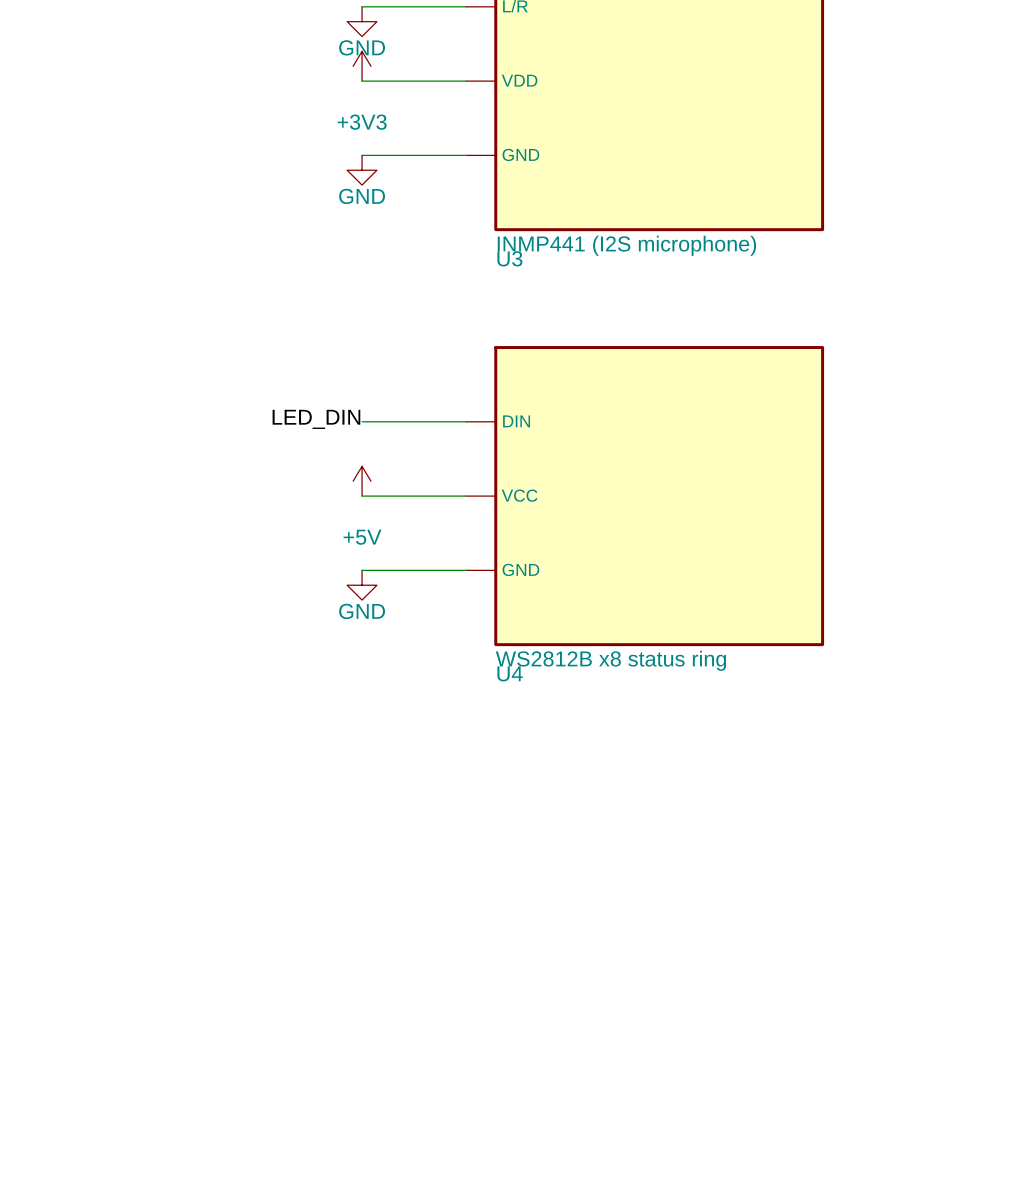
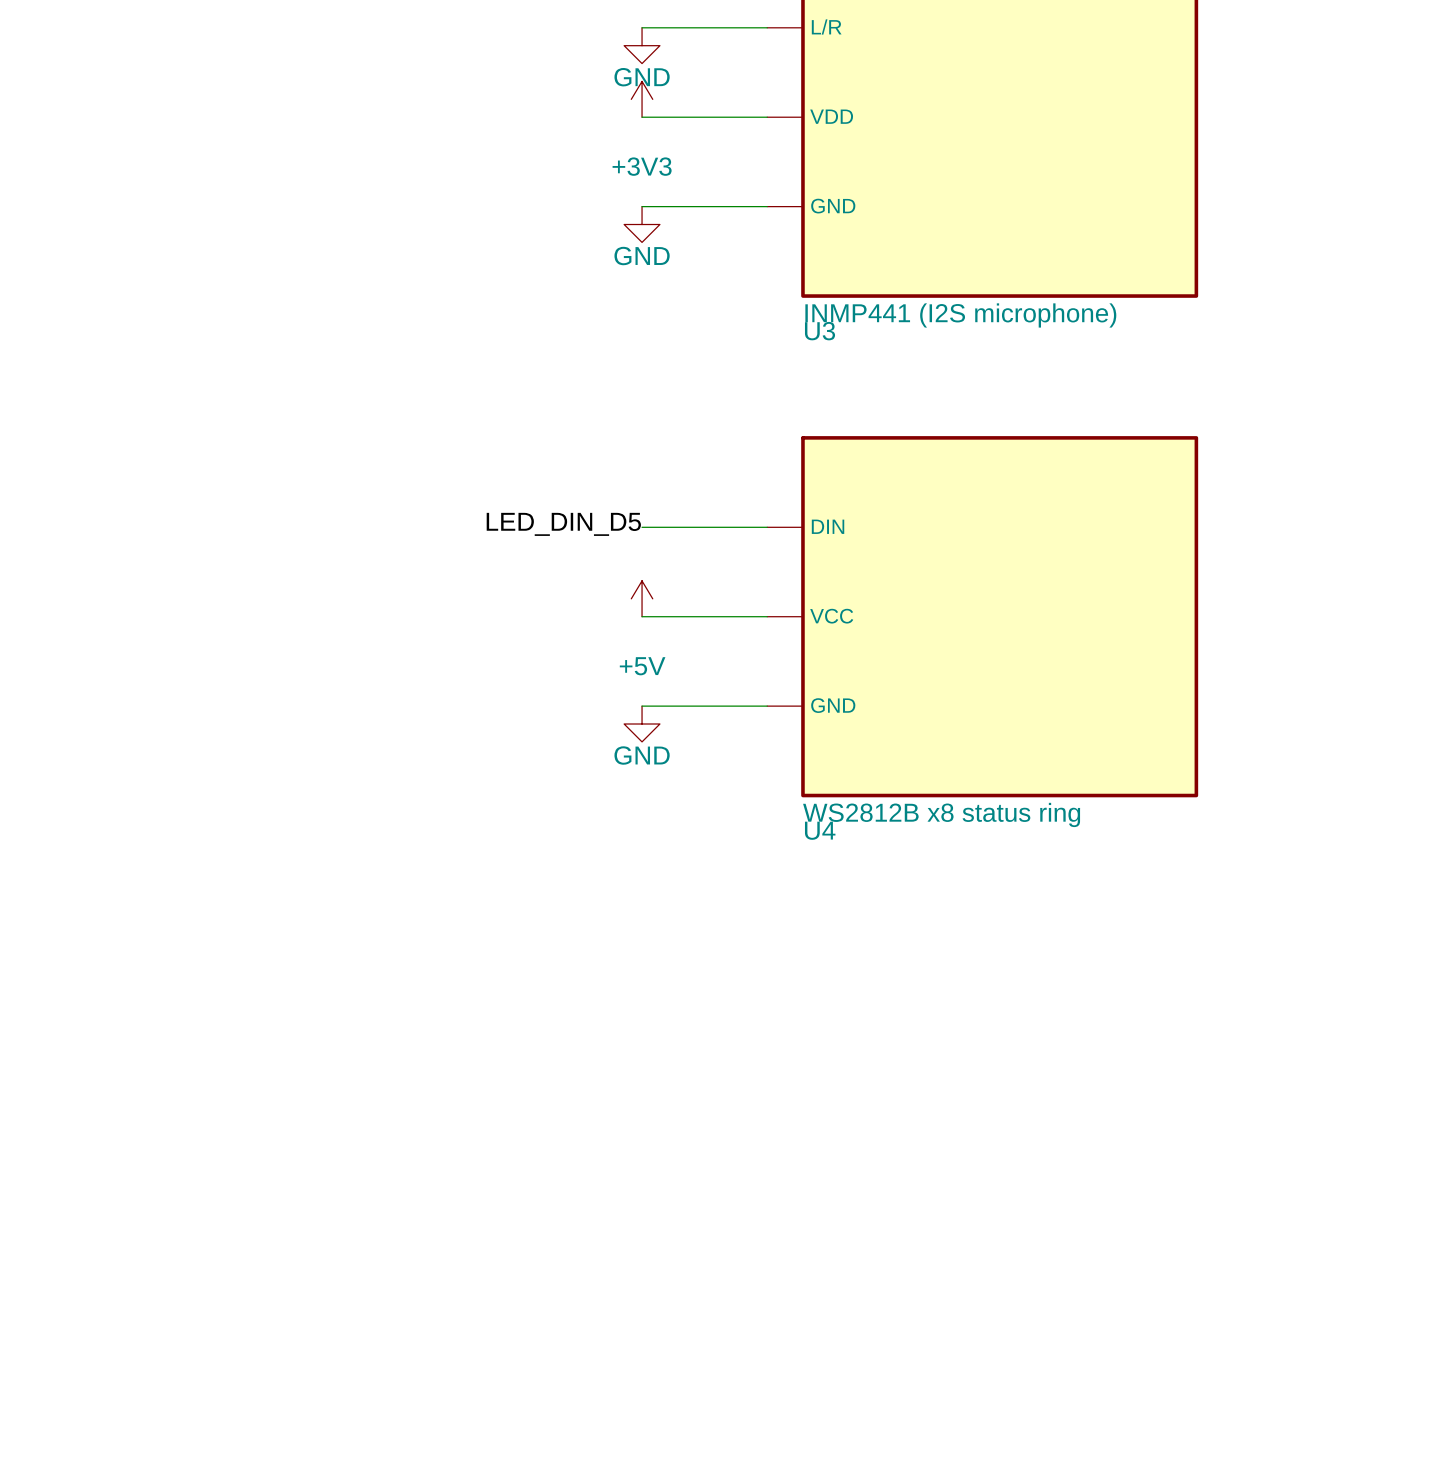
label: LED_DIN (316, 419) -> LED_DIN_D5 (563, 524)

